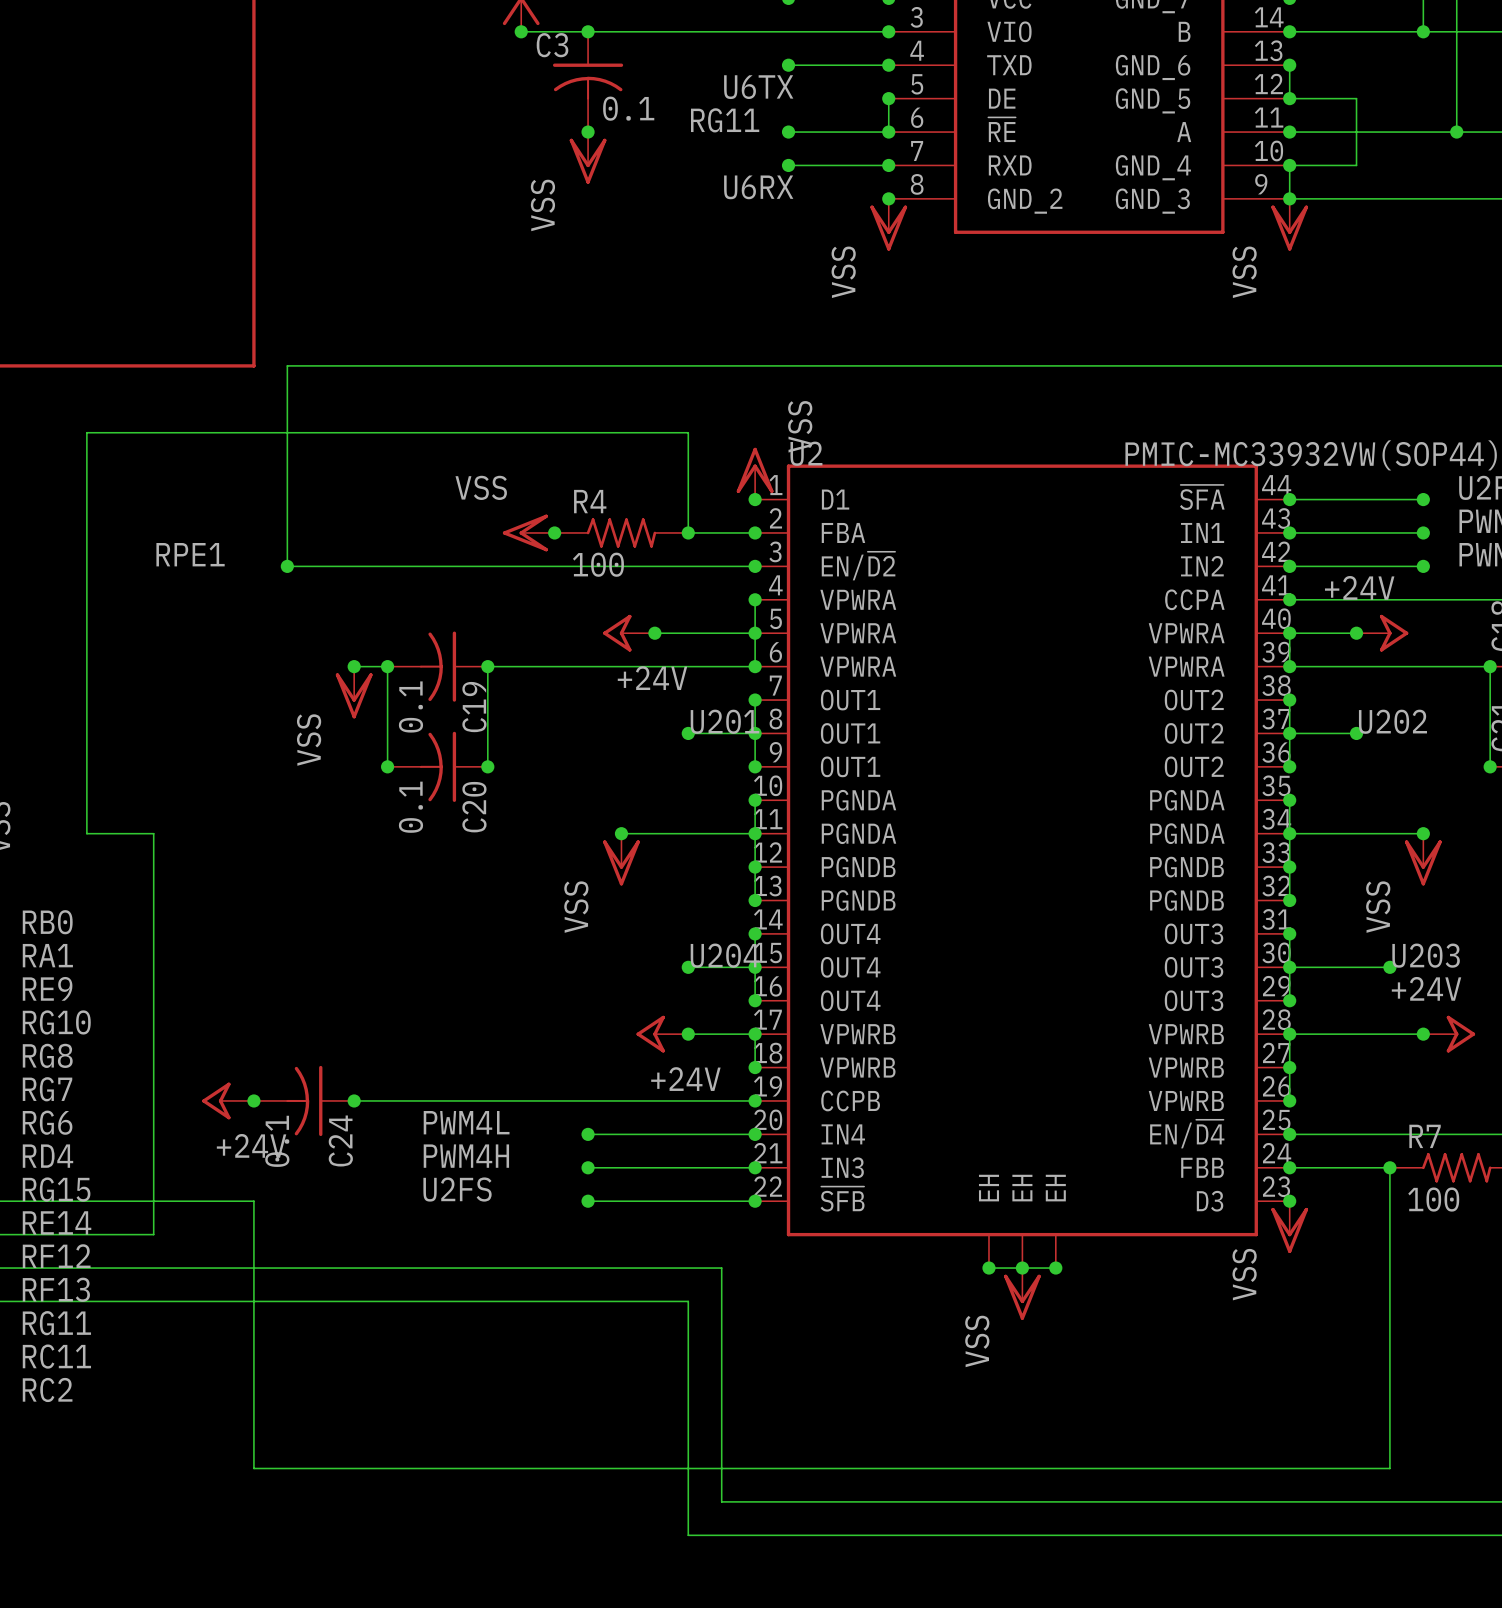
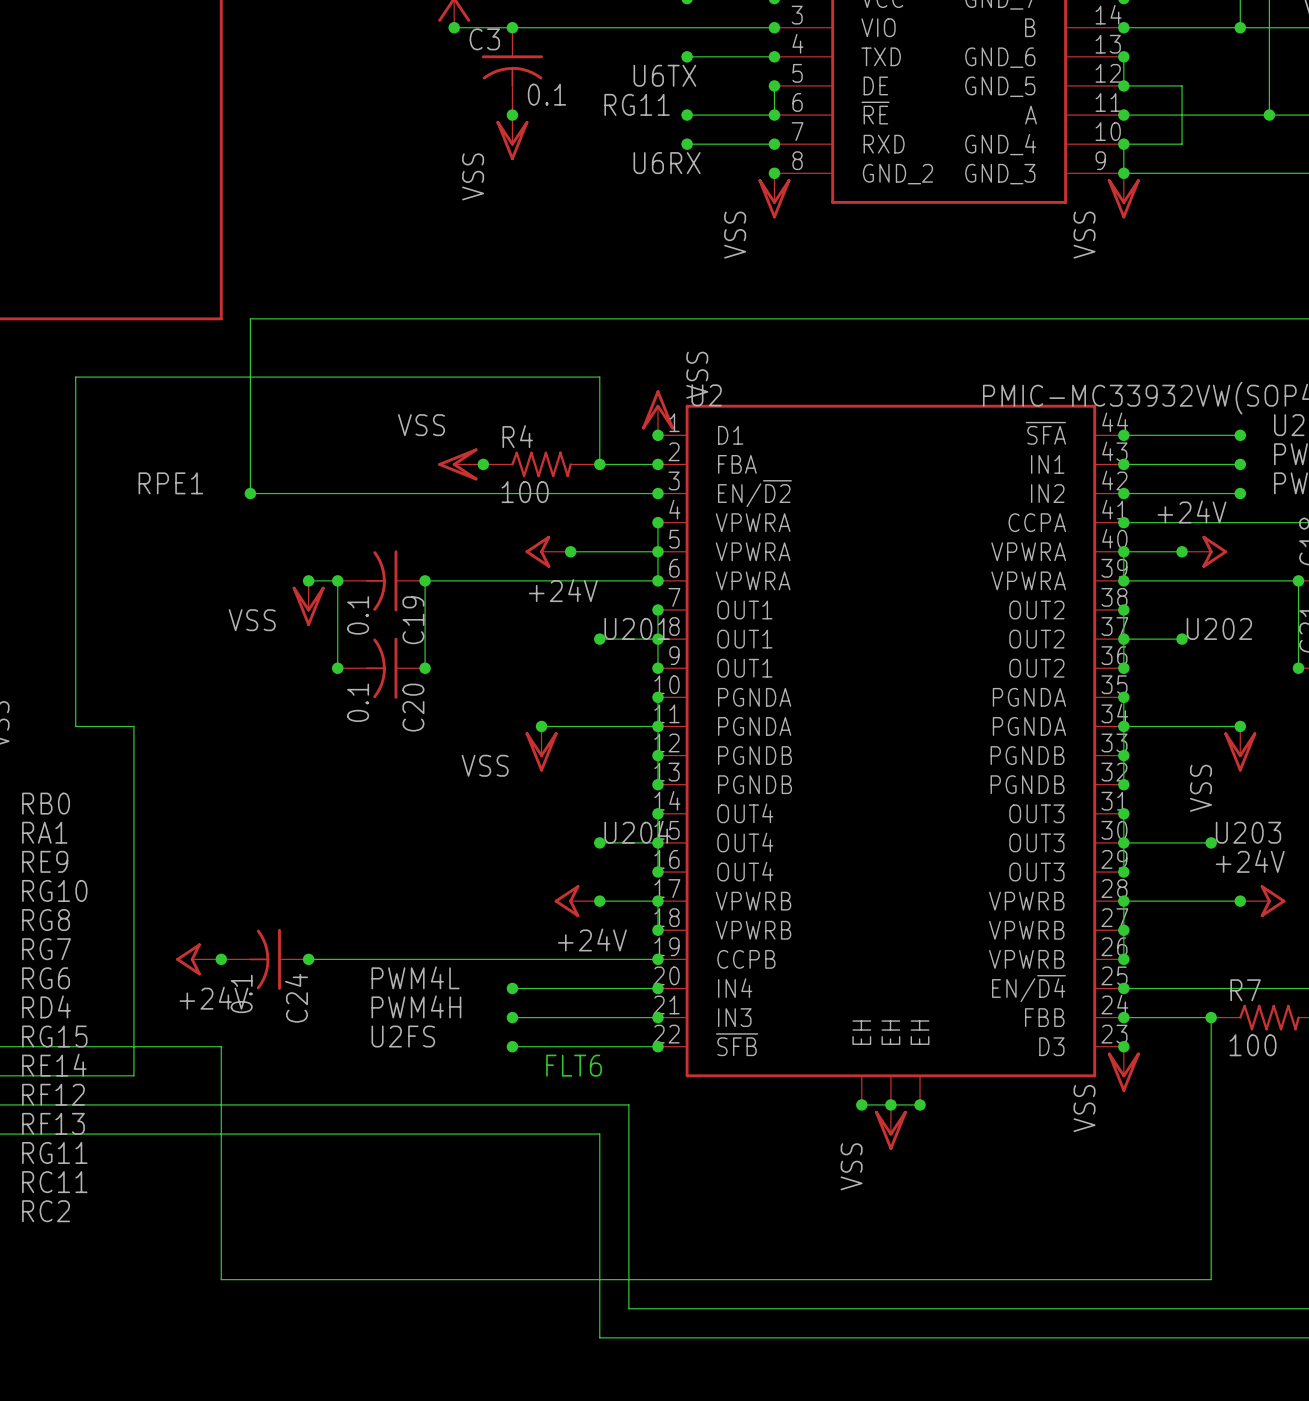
power symbol text rotation: 0° (309, 740) -> 90° clockwise (252, 620)
power symbol text rotation: 0° (576, 907) -> 90° clockwise (485, 765)
text: none -> FLT6 (574, 1065)

